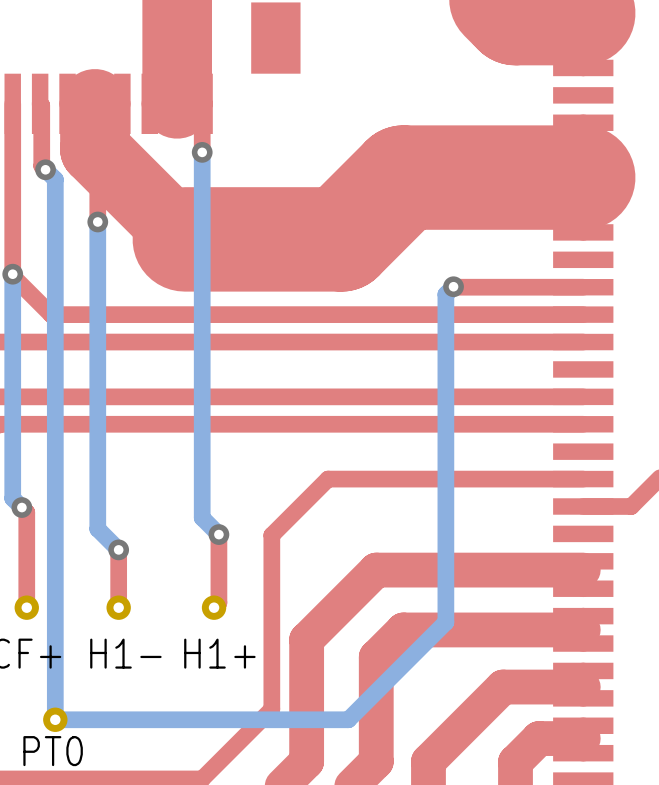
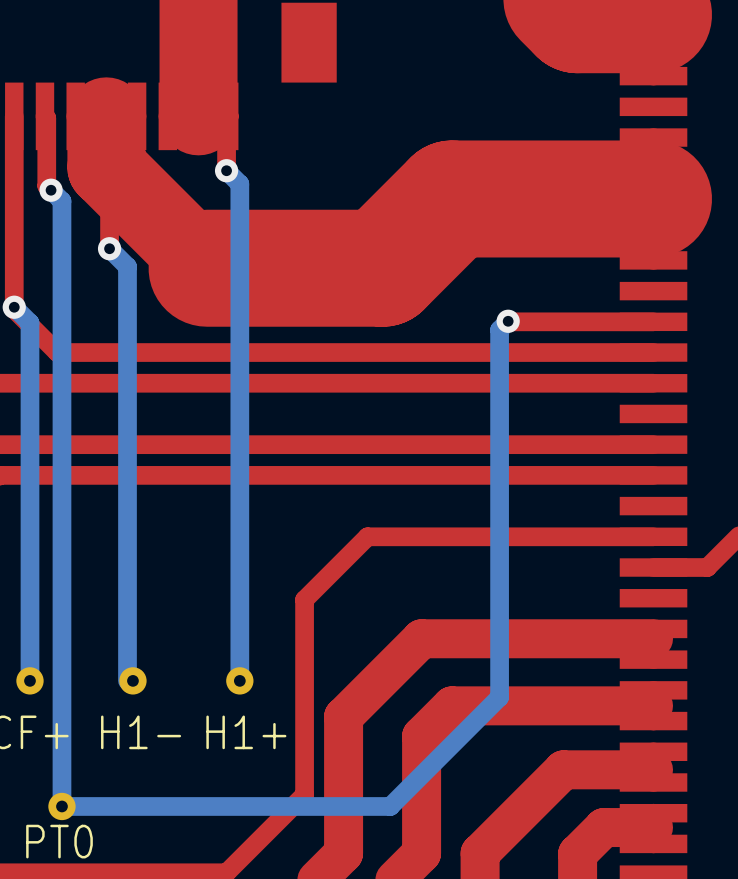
bottom track: (202, 152) (202, 517) (218, 534) -> (226, 170) (239, 183) (239, 680)
bottom track: (97, 221) (97, 529) (118, 549) -> (109, 248) (127, 266) (127, 680)
bottom track: (12, 274) (12, 498) (21, 507) -> (14, 307) (29, 322) (29, 680)
top track: (21, 507) (26, 512) (26, 607) -> none
via: (21, 507) -> none
top track: (218, 534) (218, 602) (214, 607) -> none
via: (218, 534) -> none
top track: (118, 549) (118, 607) -> none
via: (118, 549) -> none

